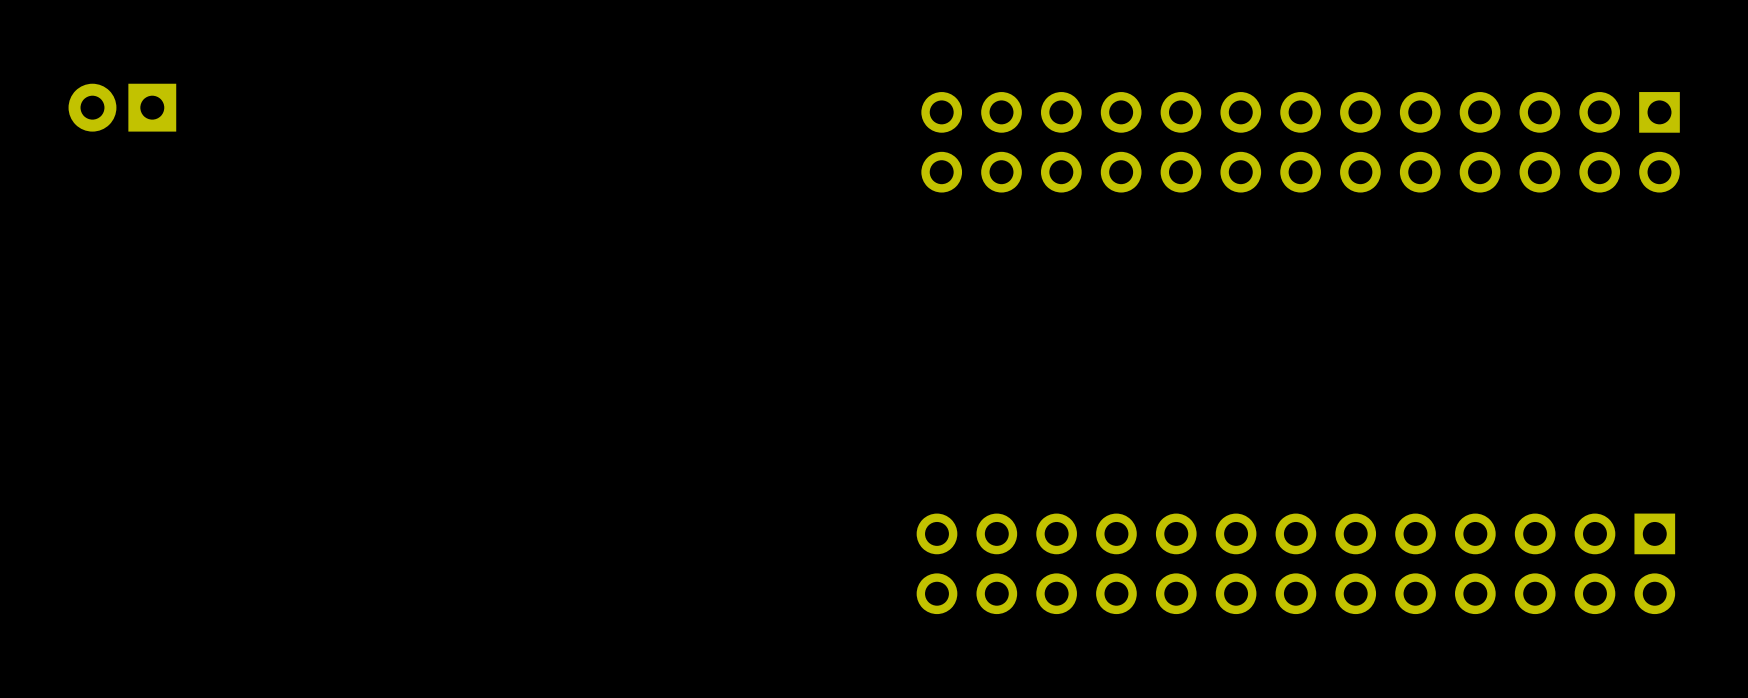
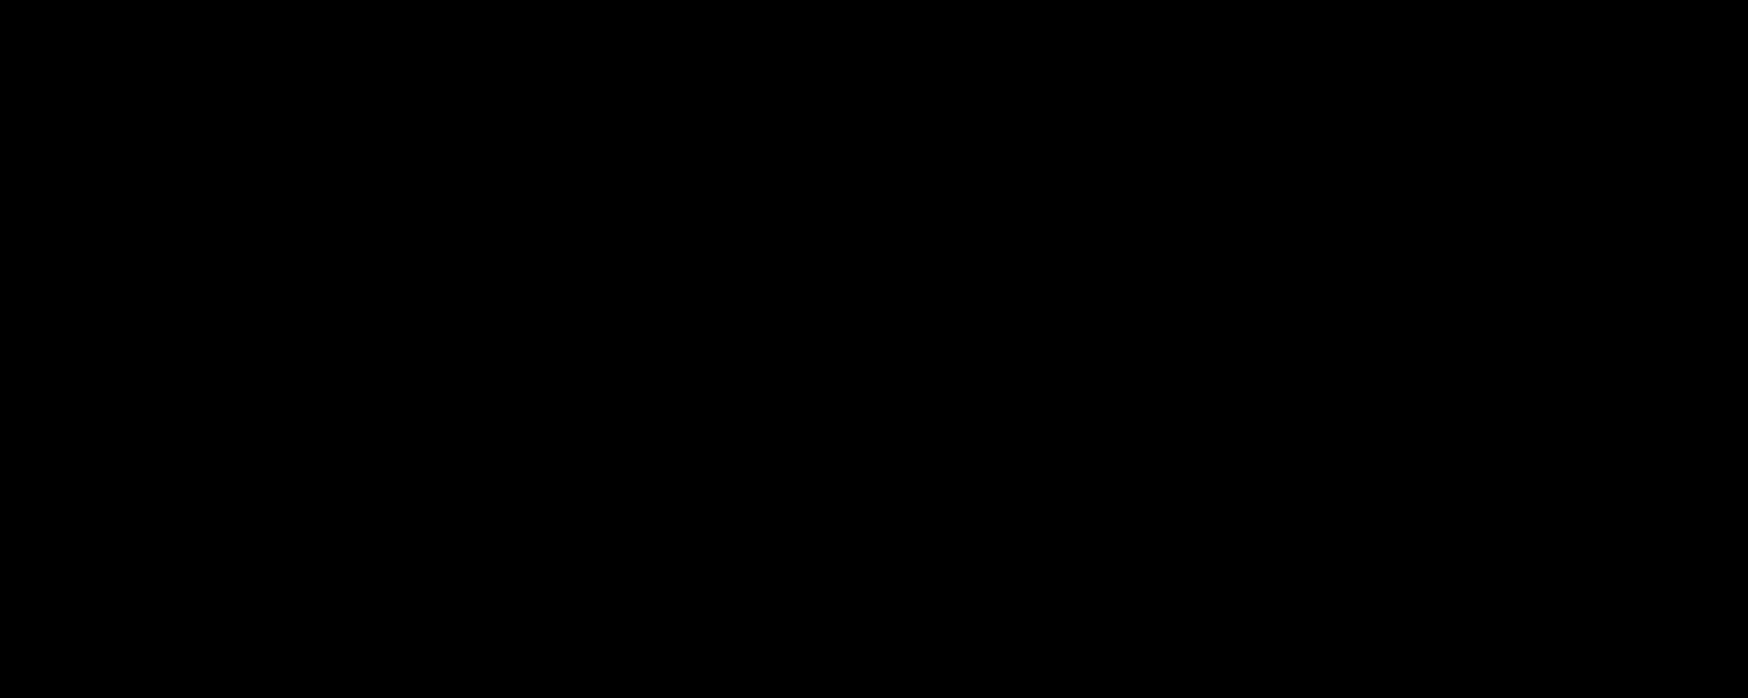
part: (122, 107) -> none
part: (1300, 142) -> none
part: (1295, 563) -> none

